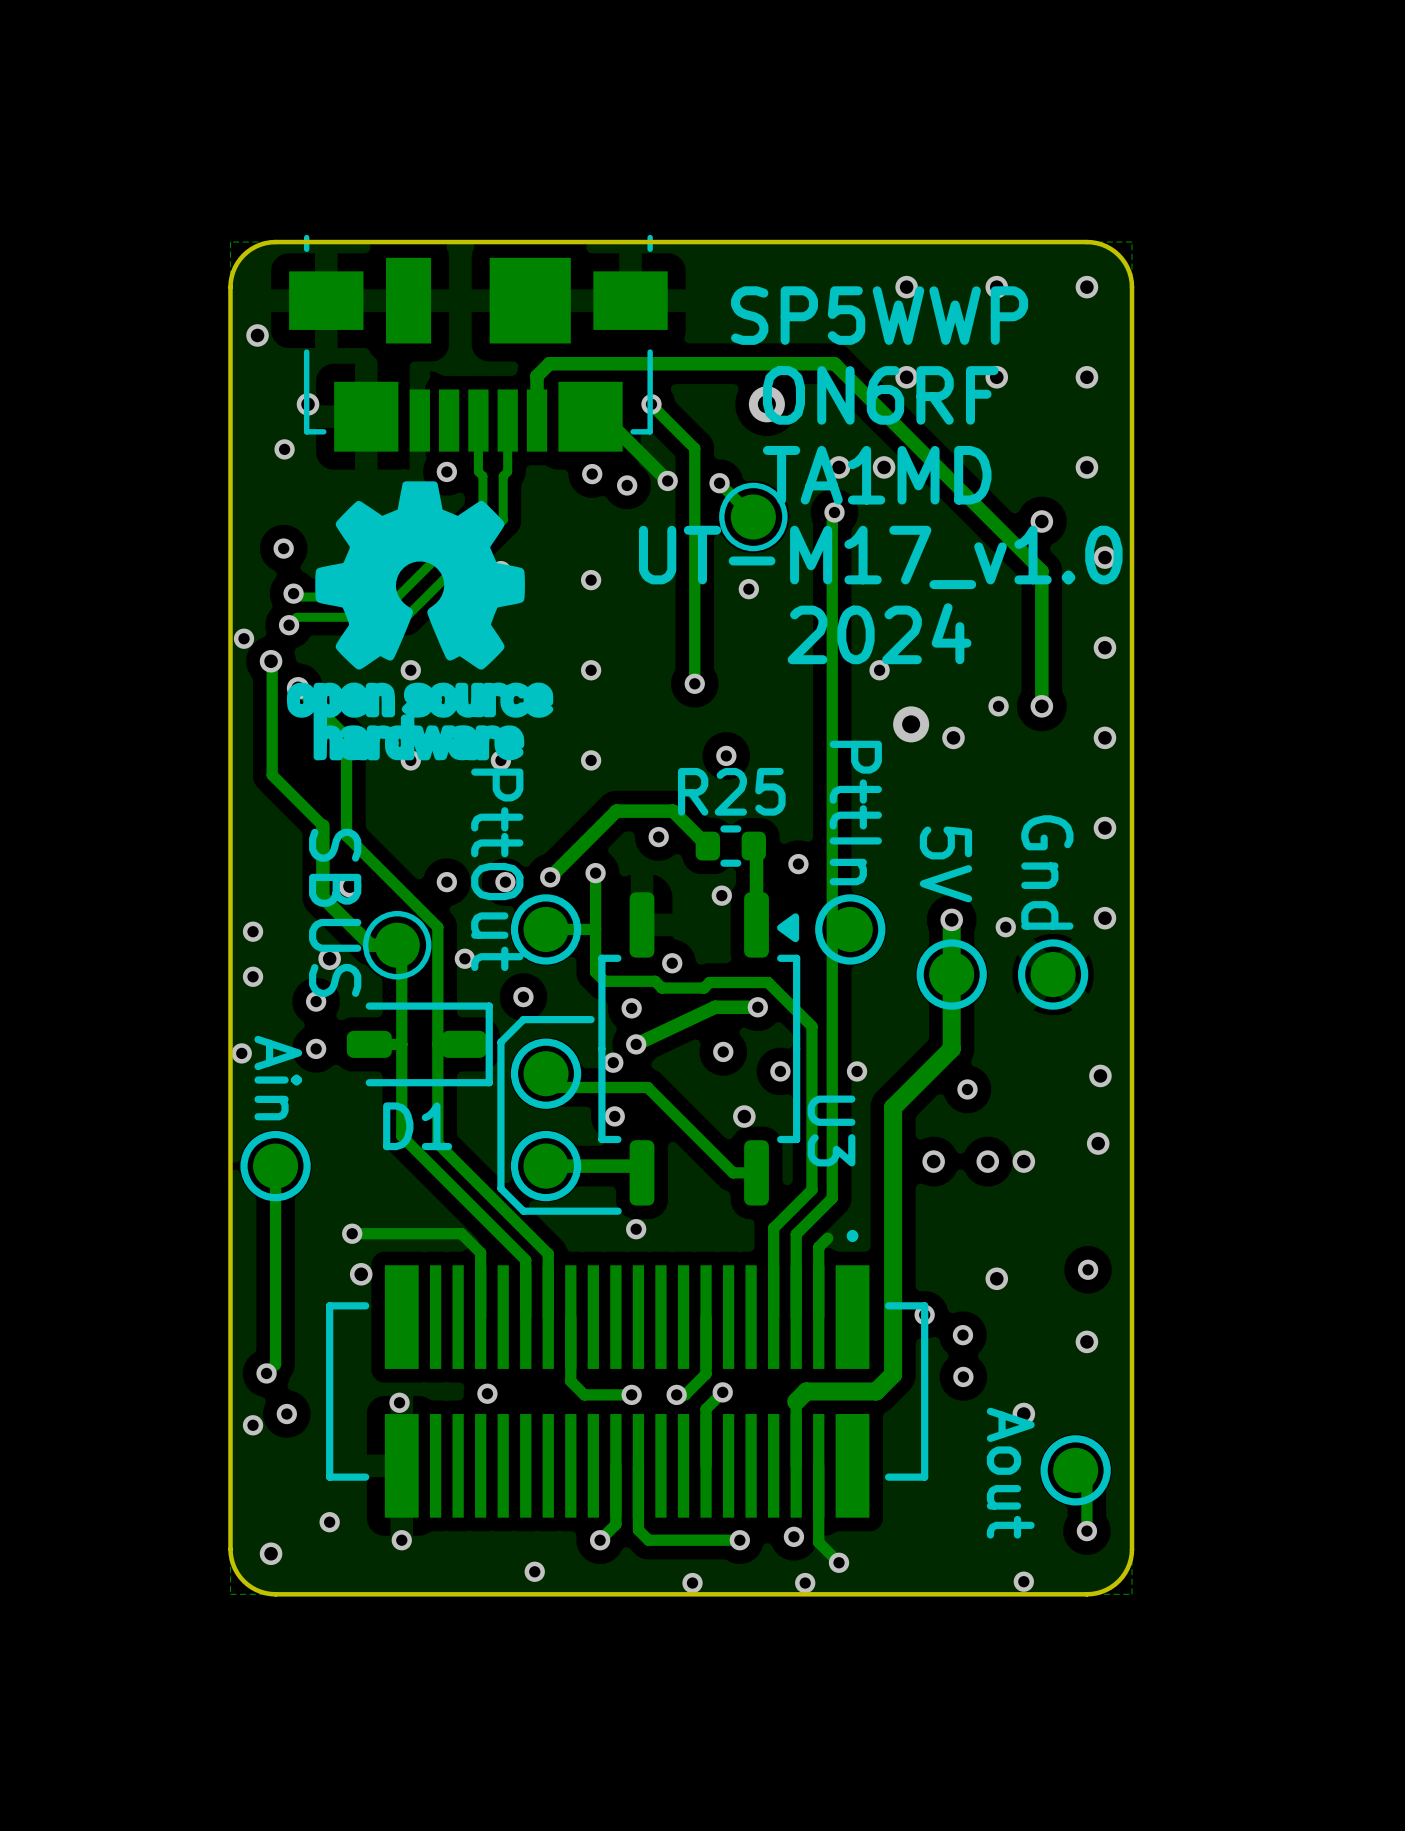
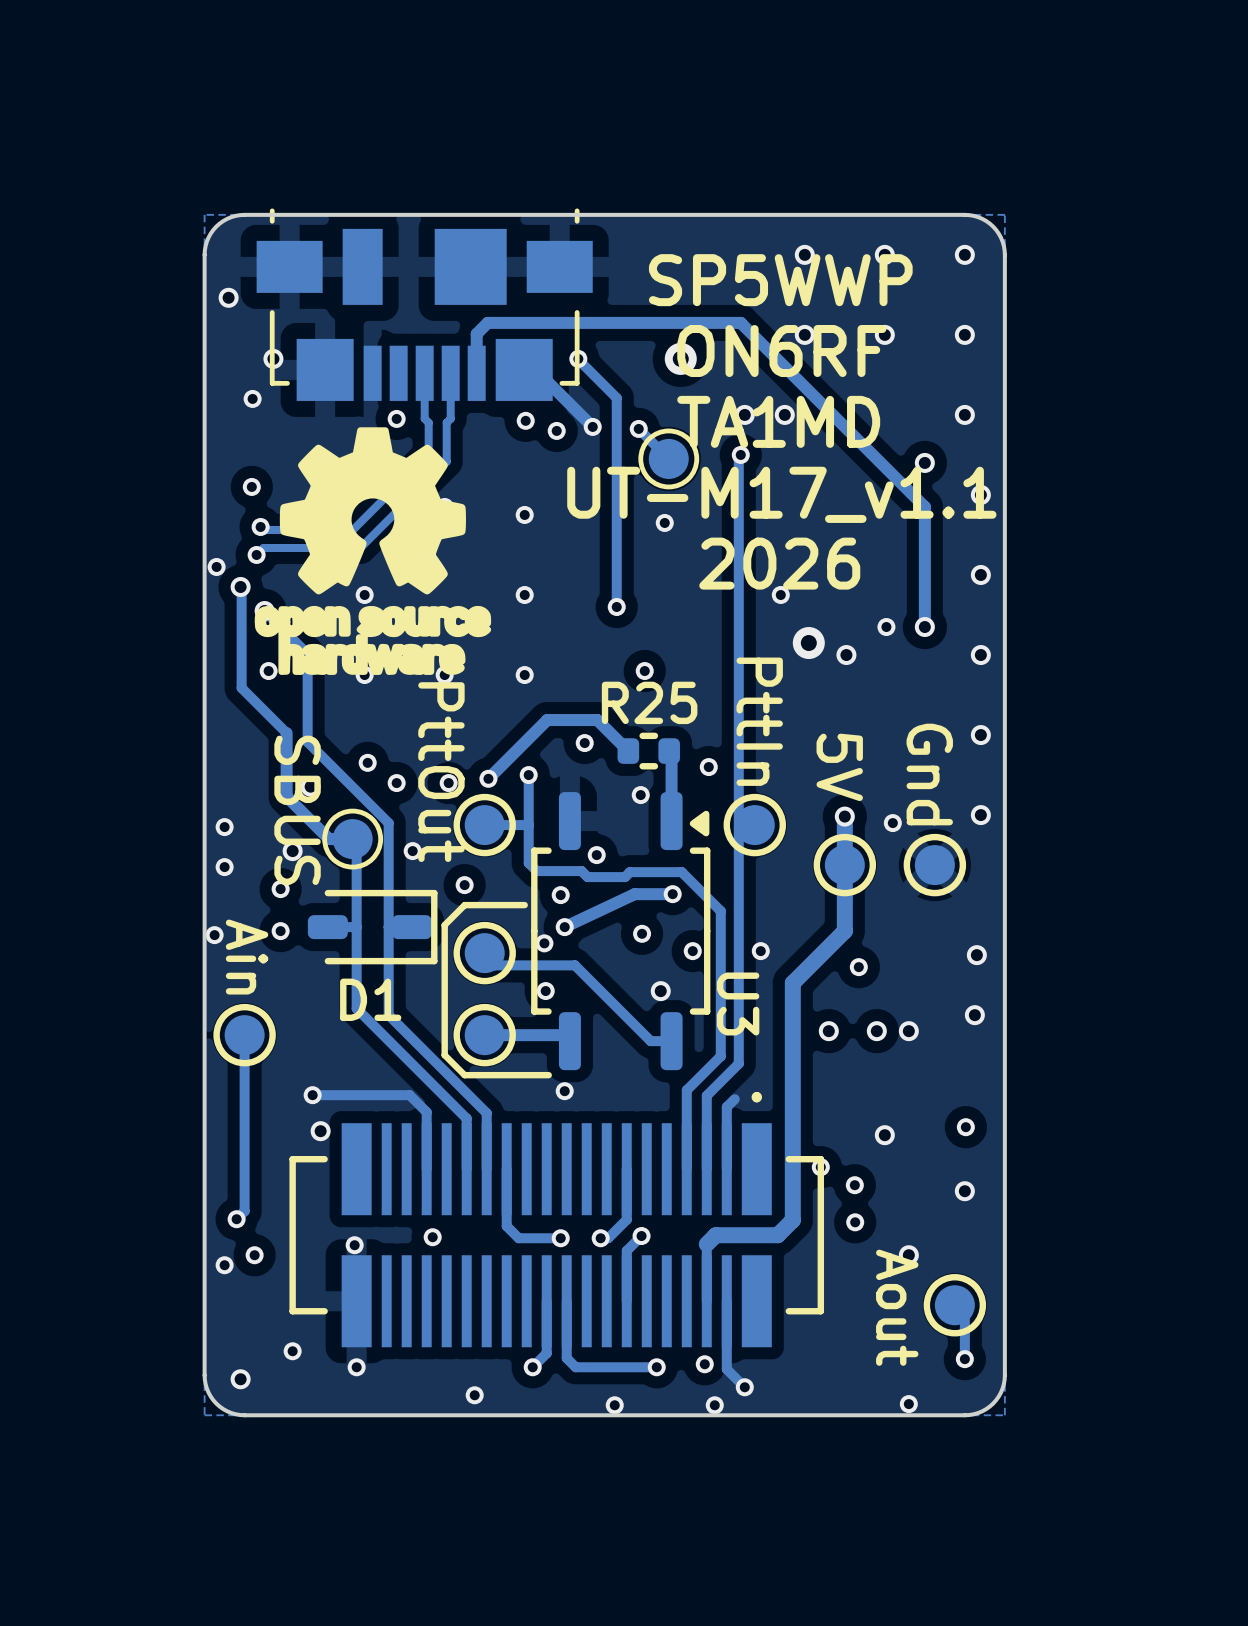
text: UT-M17_v1.0 (880, 557) -> UT-M17_v1.1 (781, 494)
text: 2024 (879, 633) -> 2026 (779, 563)
via: none -> (268, 671)
via: none -> (367, 762)

